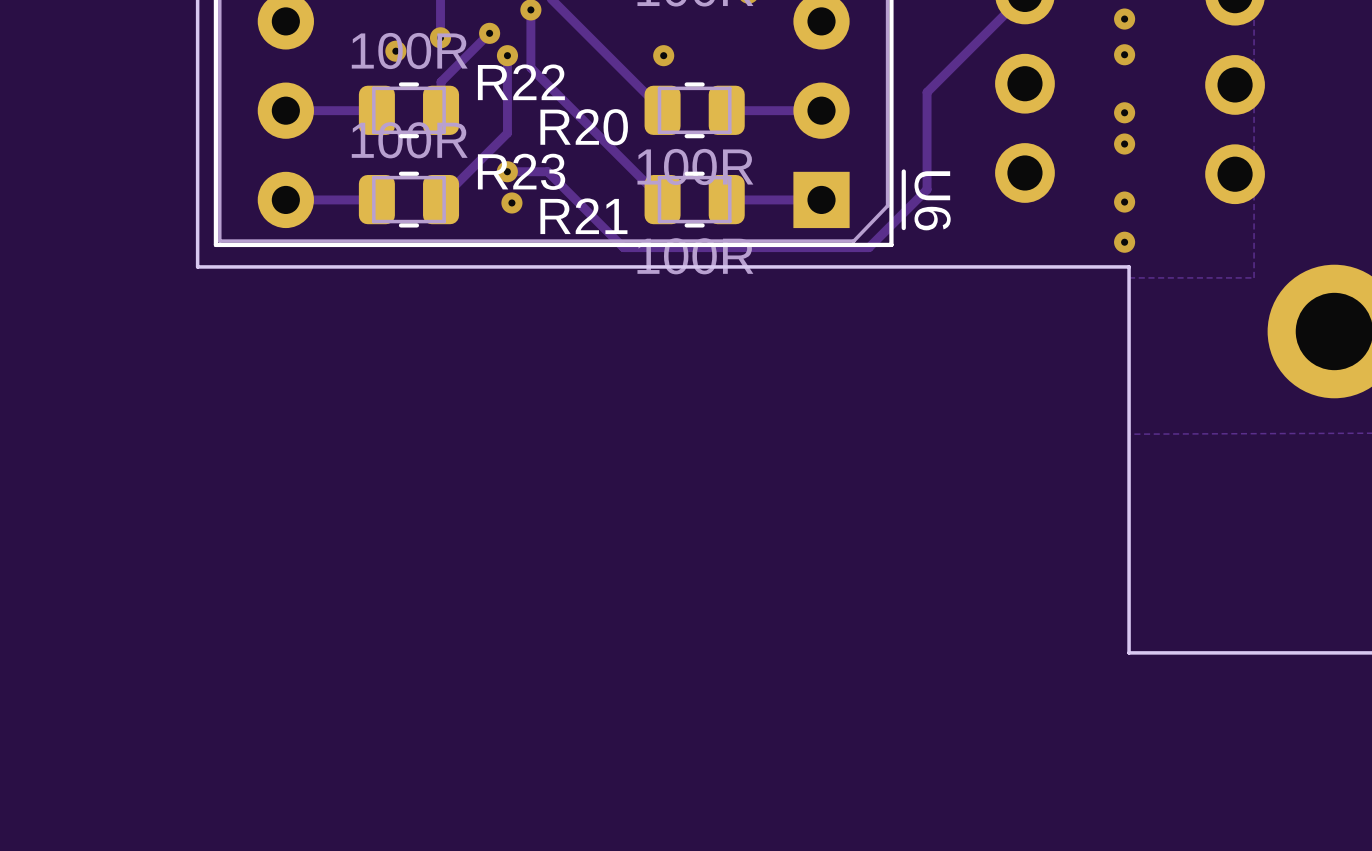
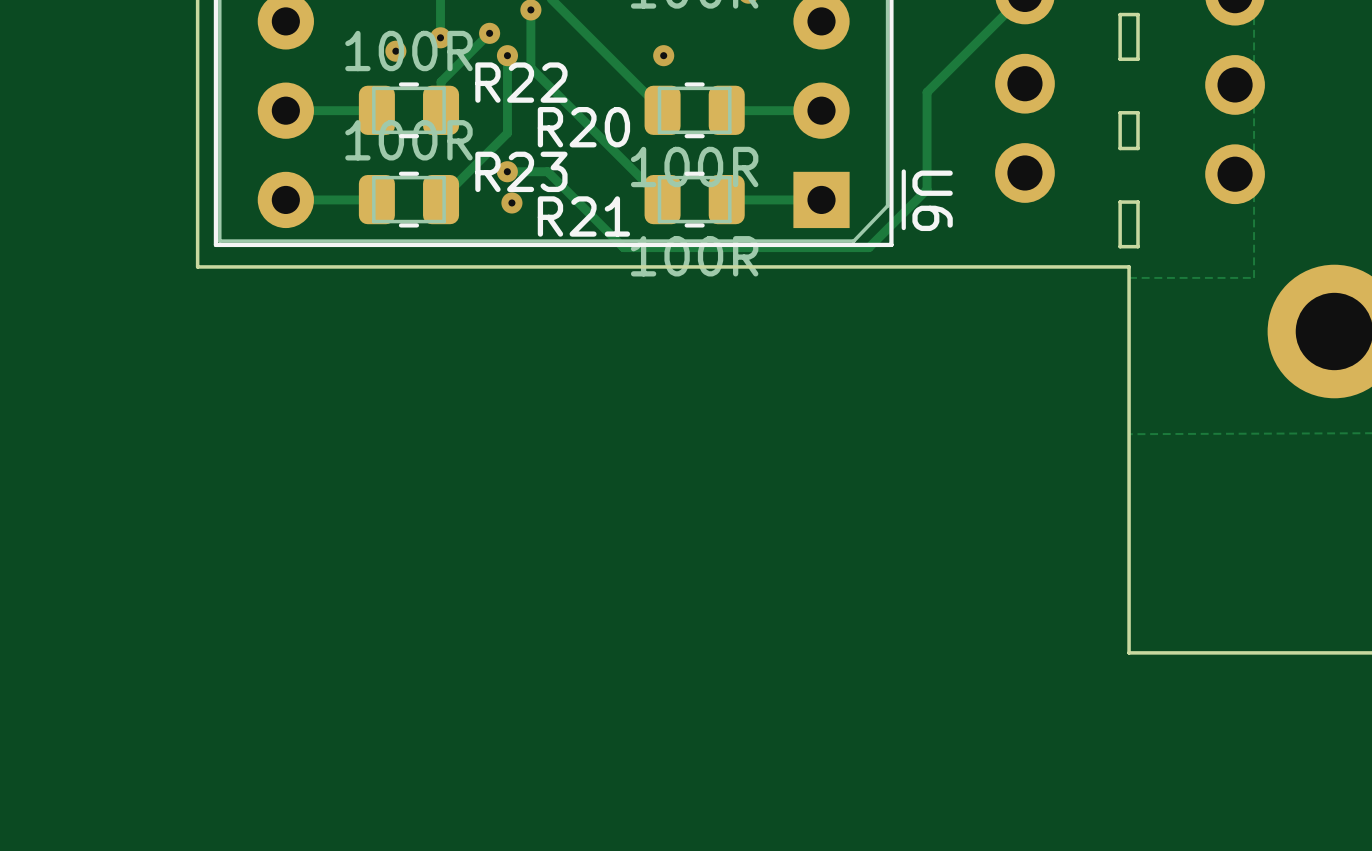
board edge: none -> (1137, 14) (1137, 59) (1120, 59) (1120, 14) (1137, 14)
via: (1124, 19) -> none
via: (1124, 54) -> none
via: (1124, 112) -> none
board edge: none -> (1137, 112) (1137, 148) (1120, 148) (1120, 112) (1137, 112)
via: (1124, 144) -> none
via: (1124, 202) -> none
board edge: none -> (1137, 202) (1120, 202) (1120, 246) (1137, 246) (1137, 202)
via: (1124, 242) -> none

